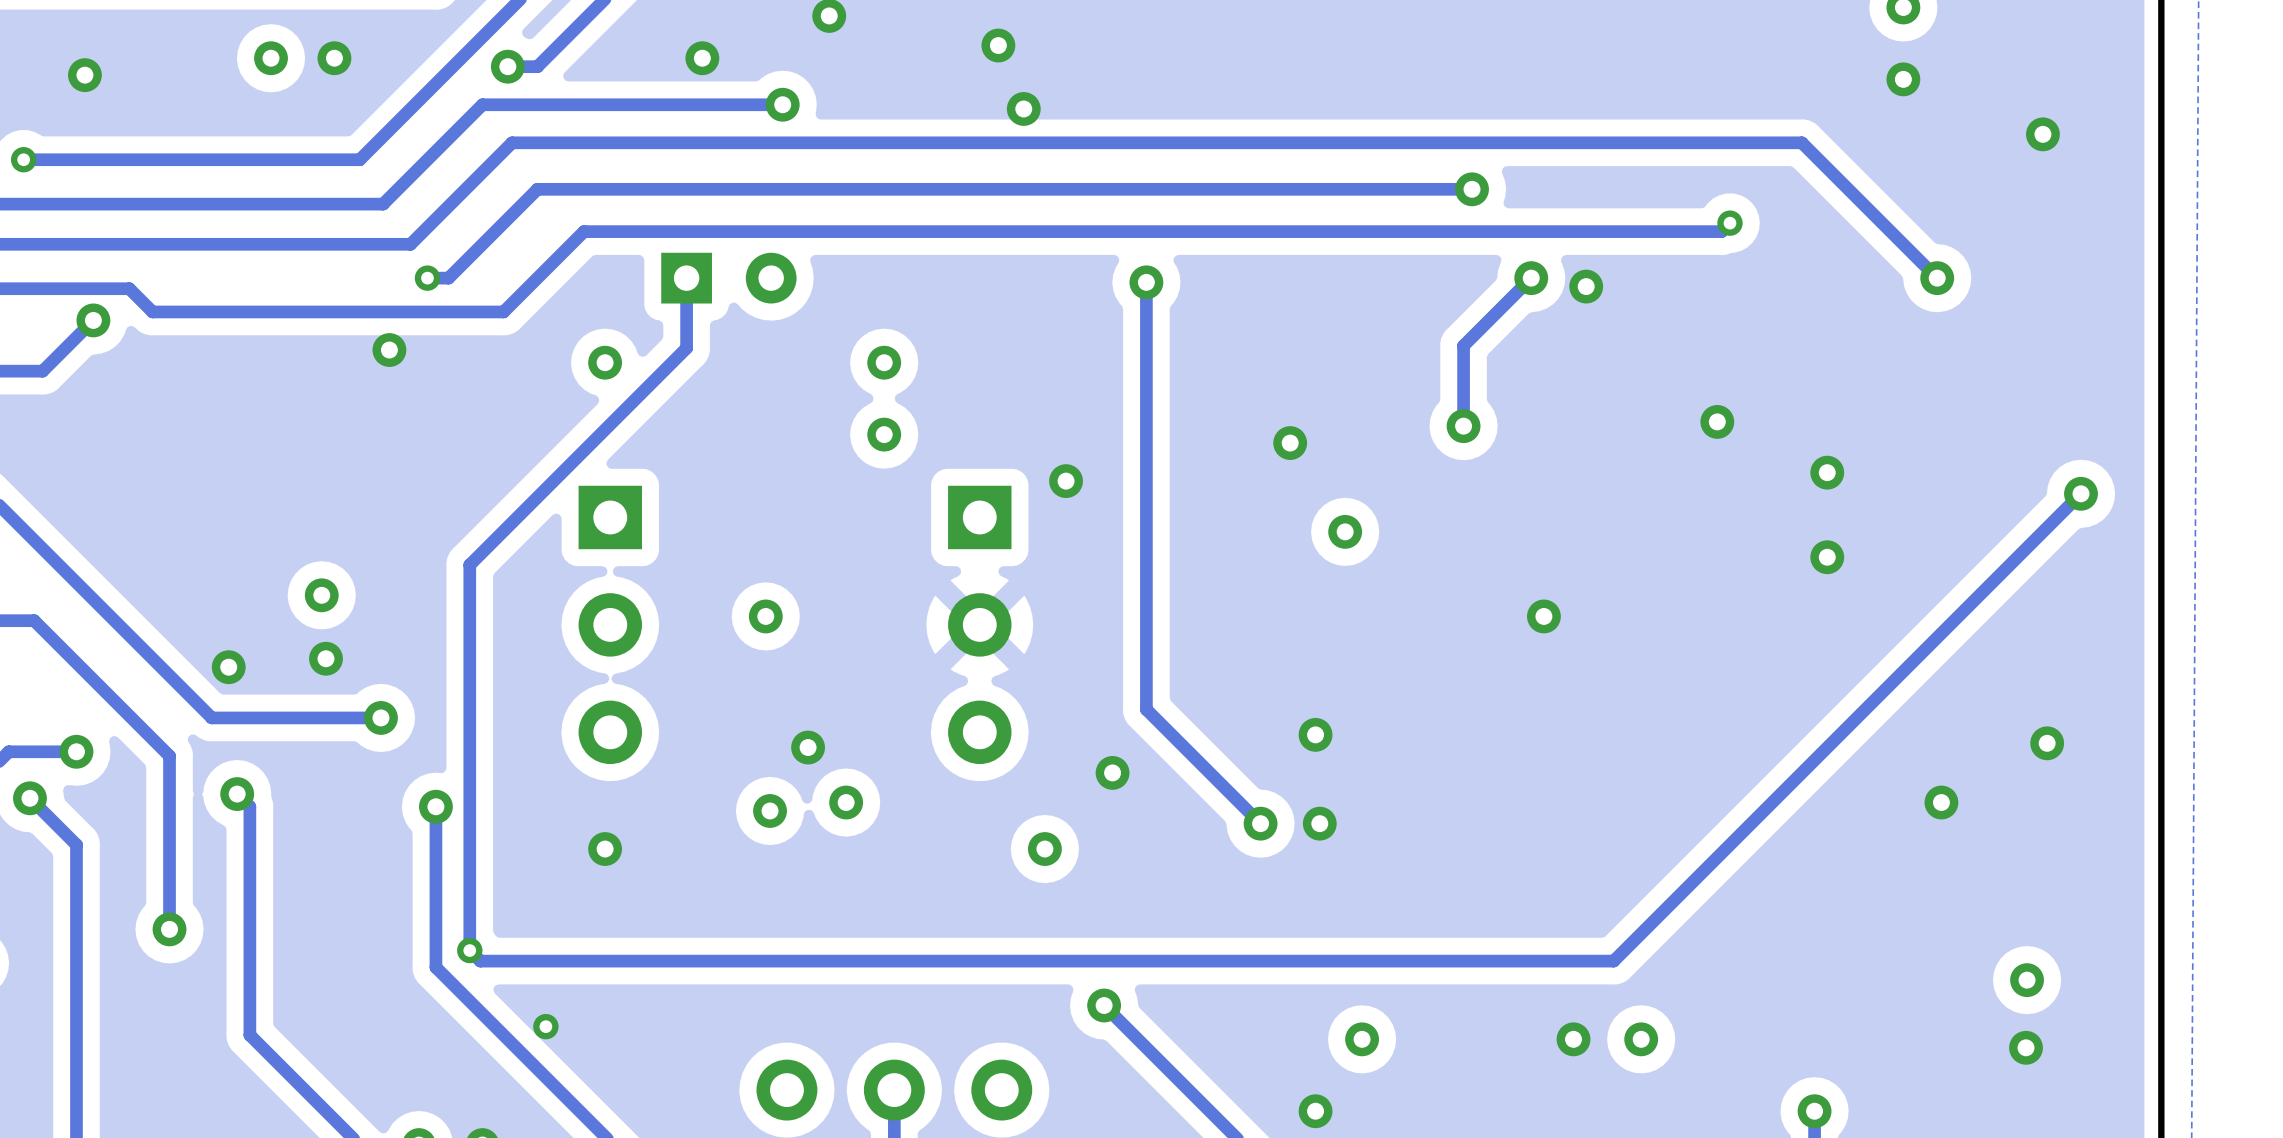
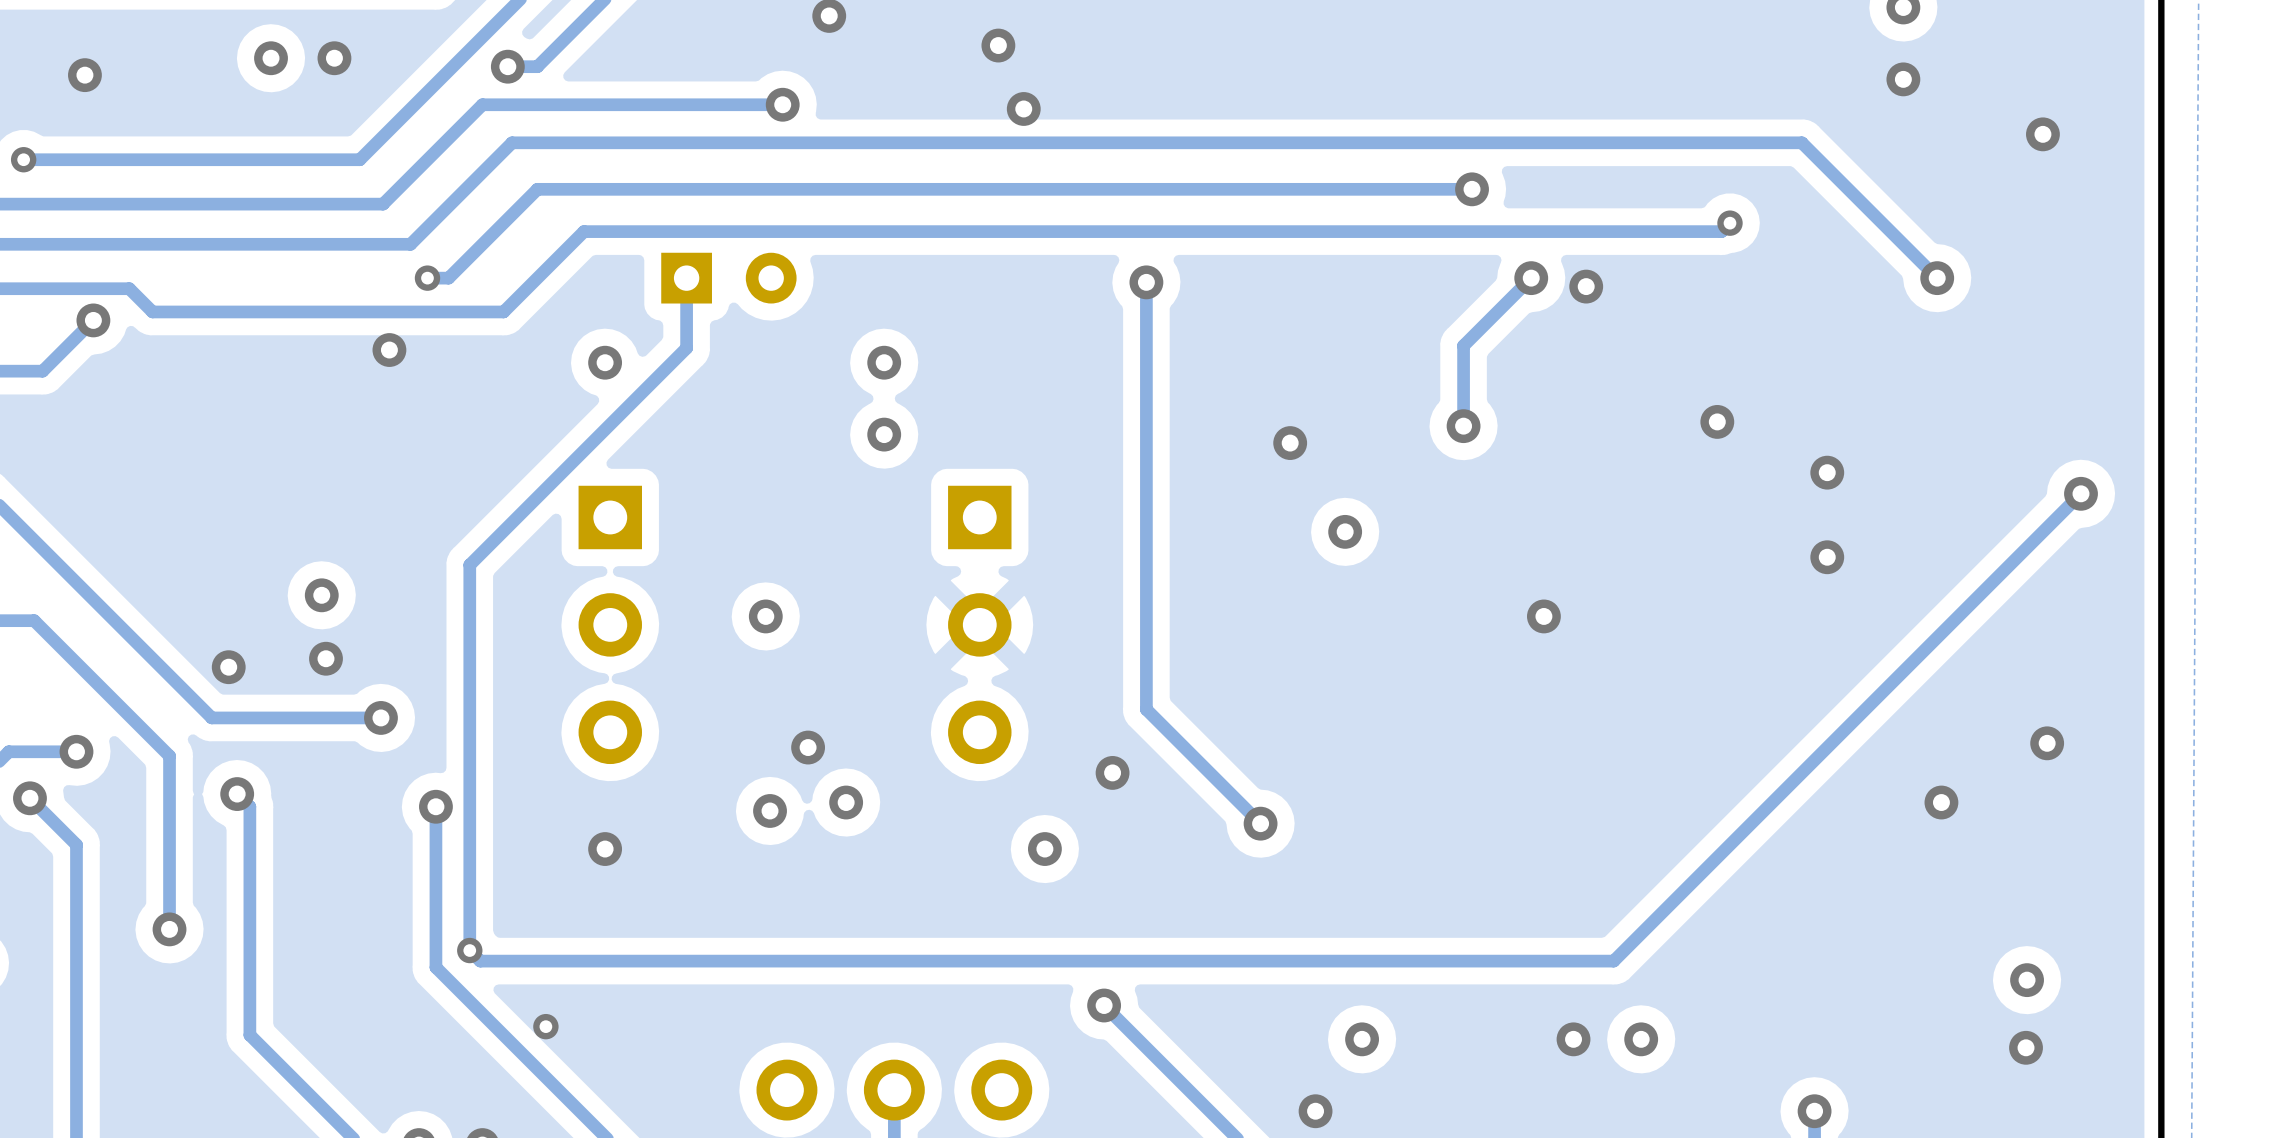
via: (702, 58) -> none
via: (1066, 481) -> none
via: (1315, 734) -> none
via: (1319, 823) -> none

